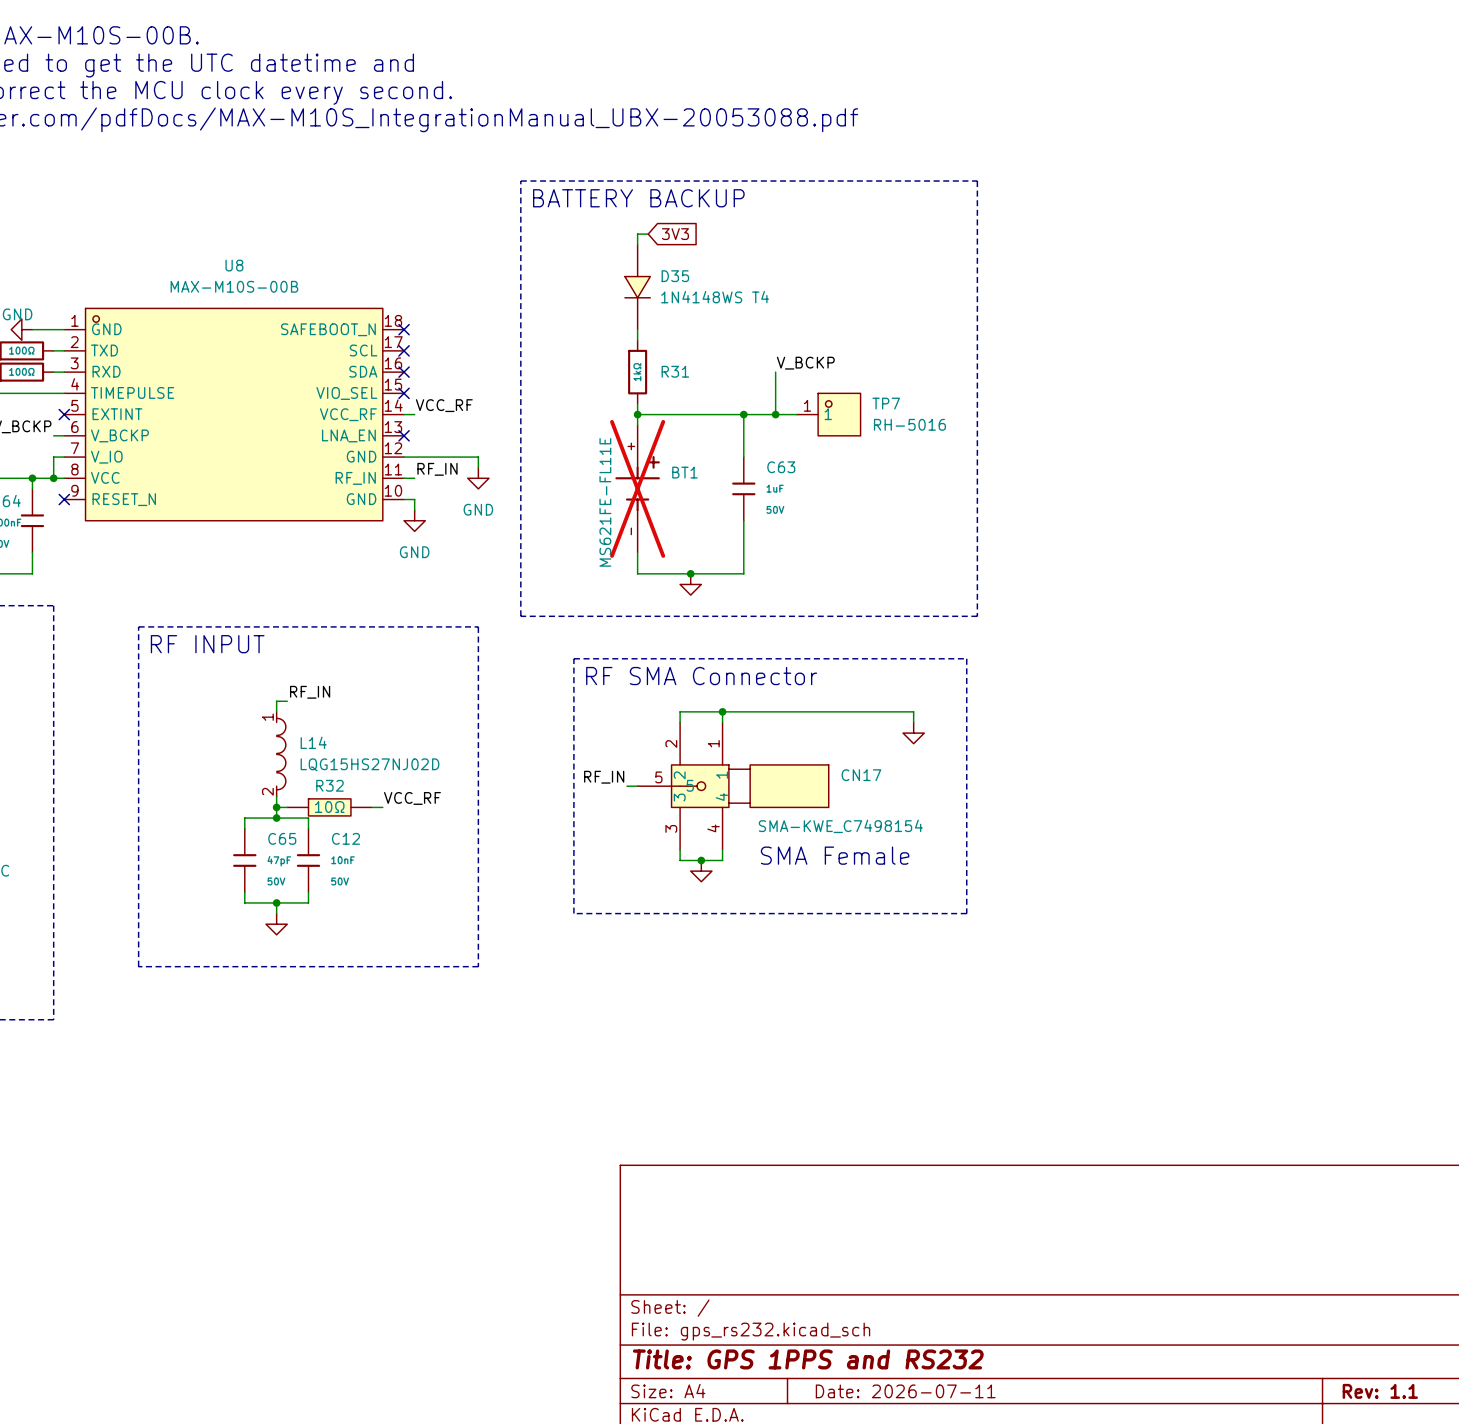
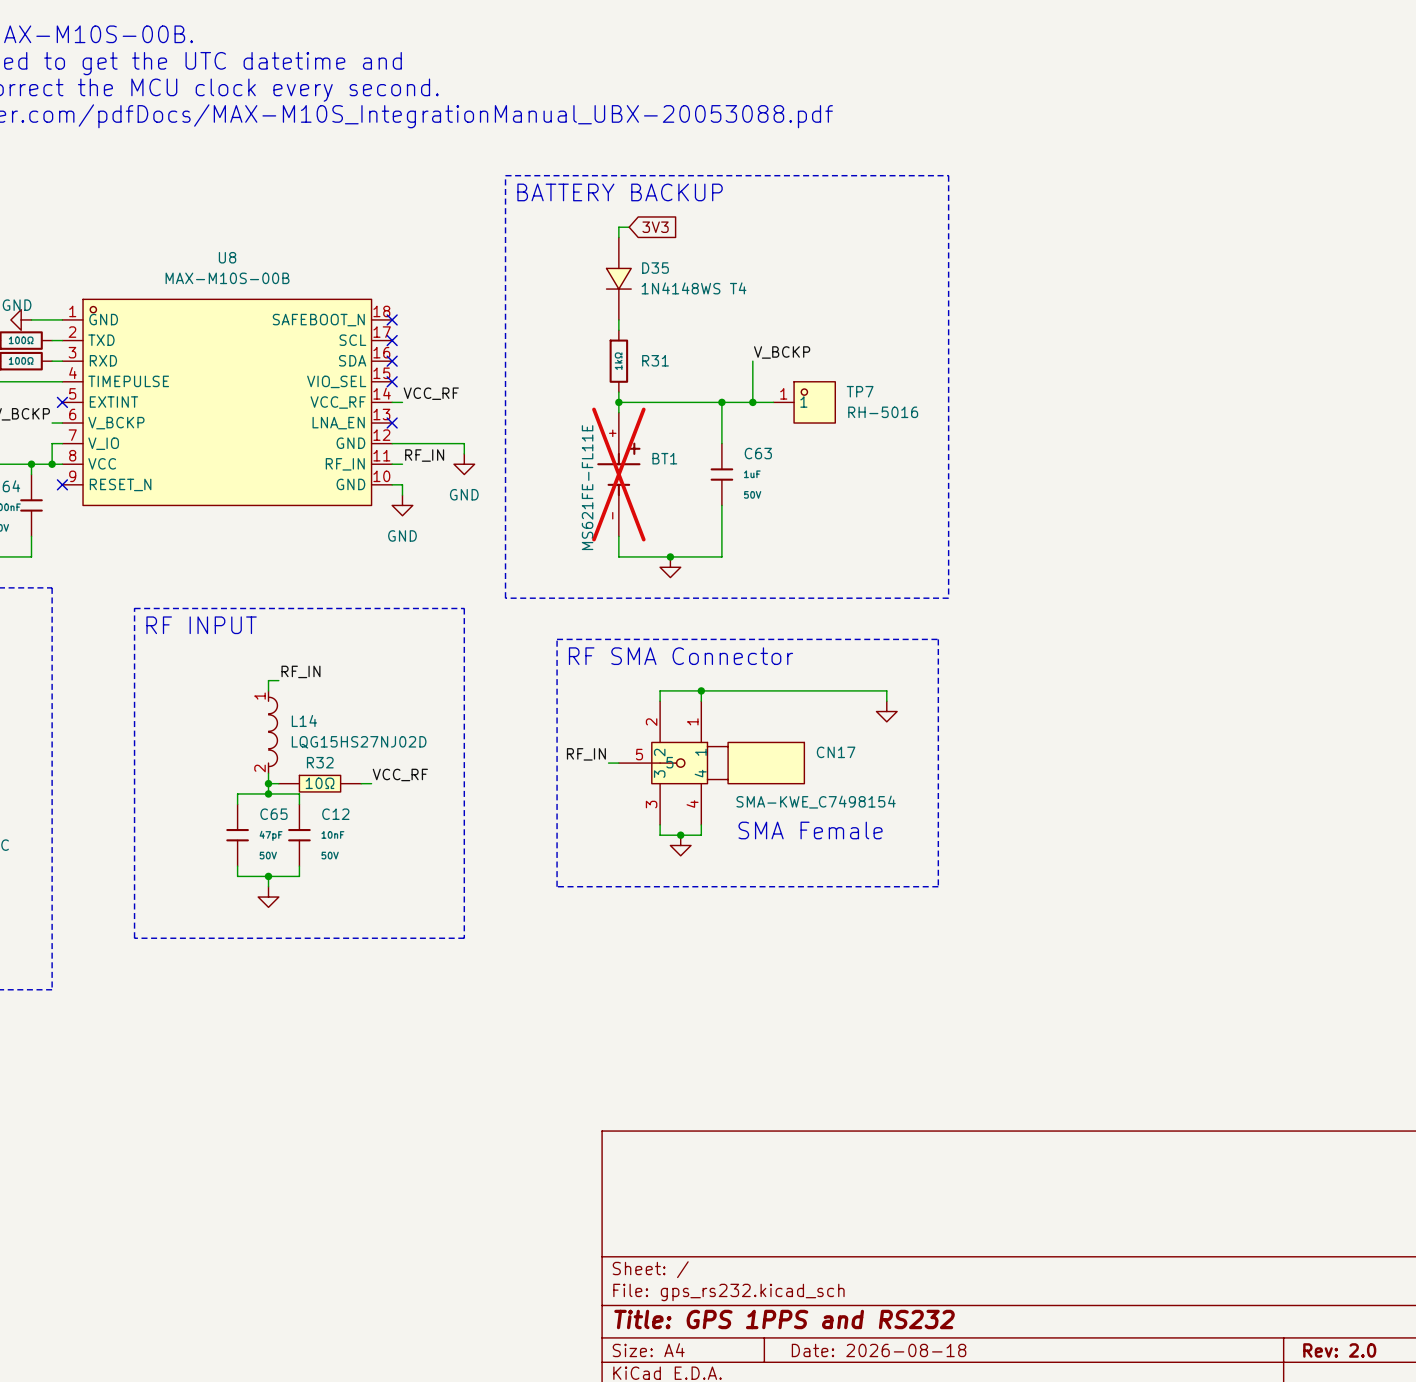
title block: Date: 2026-07-11 (905, 1391) -> Date: 2026-08-18 (879, 1350)
title block: Rev: 1.1 (1380, 1391) -> Rev: 2.0 (1339, 1350)

